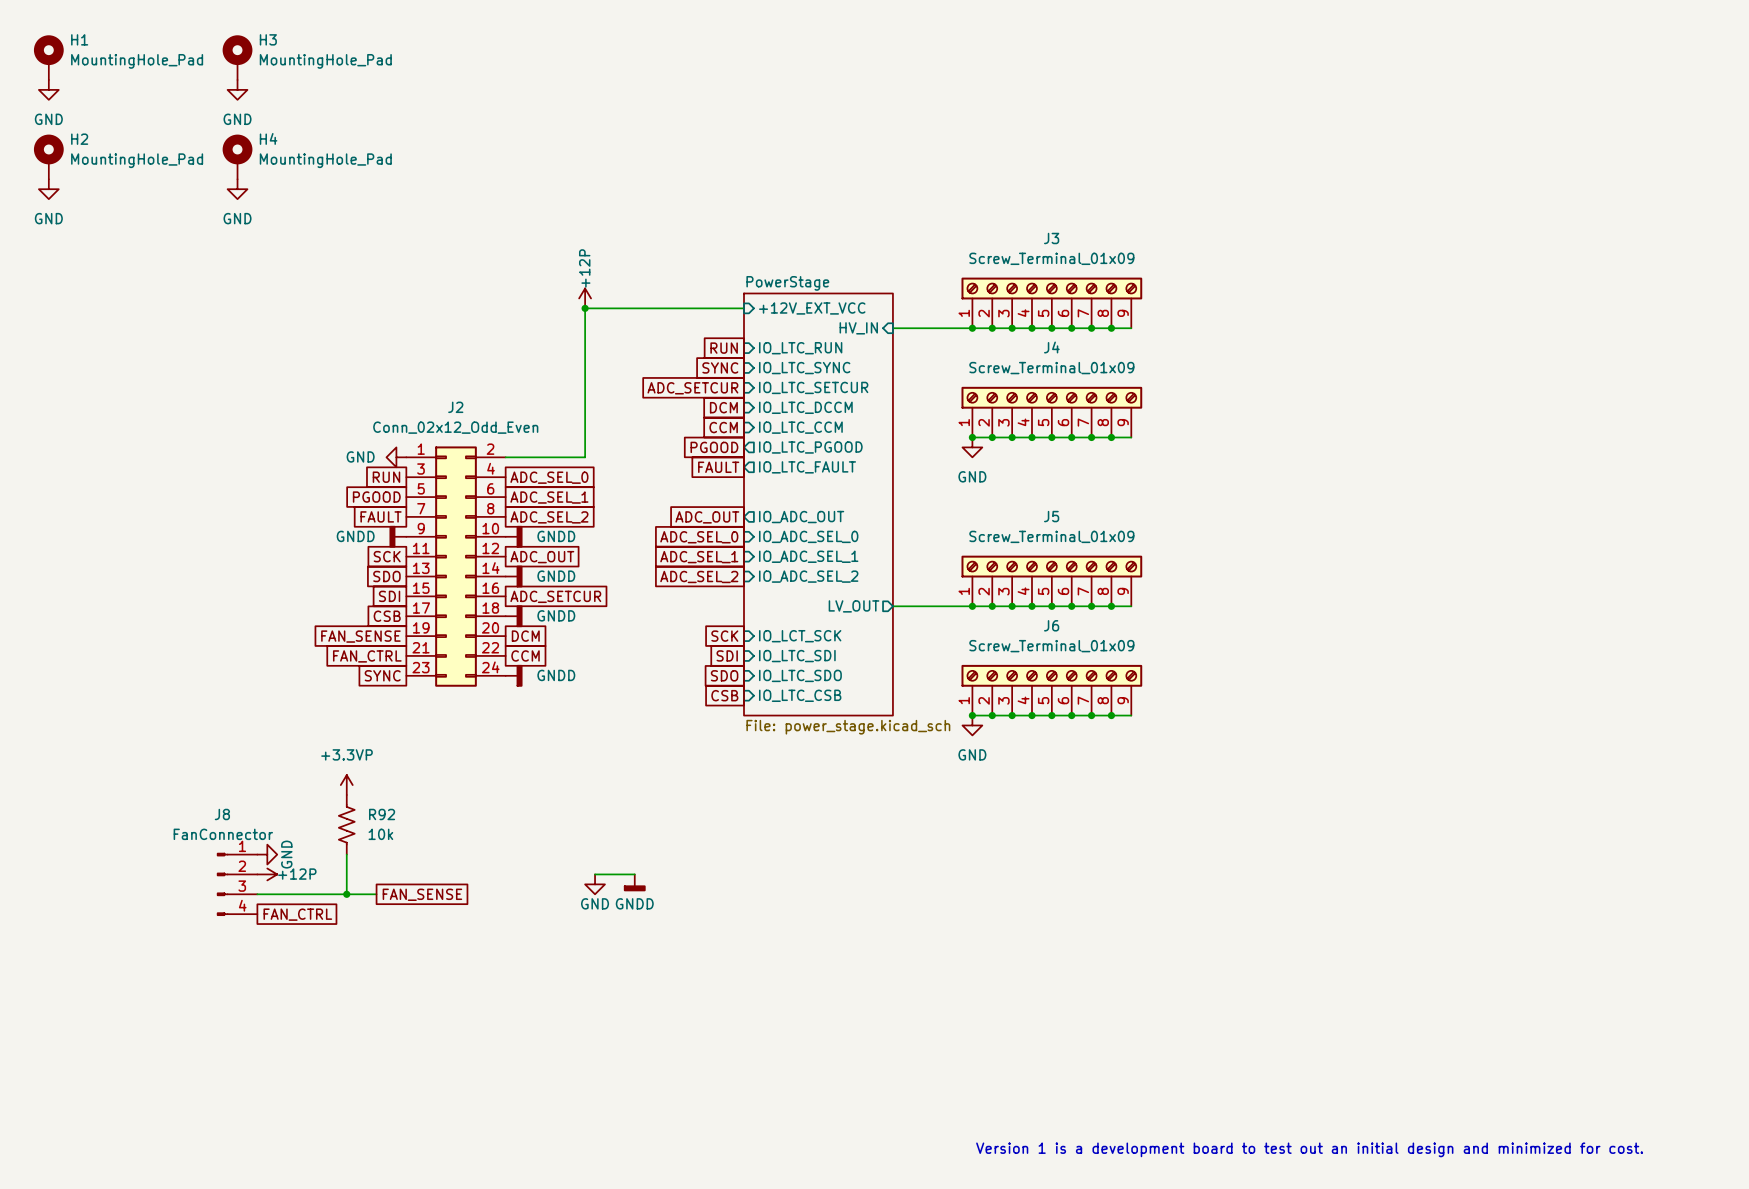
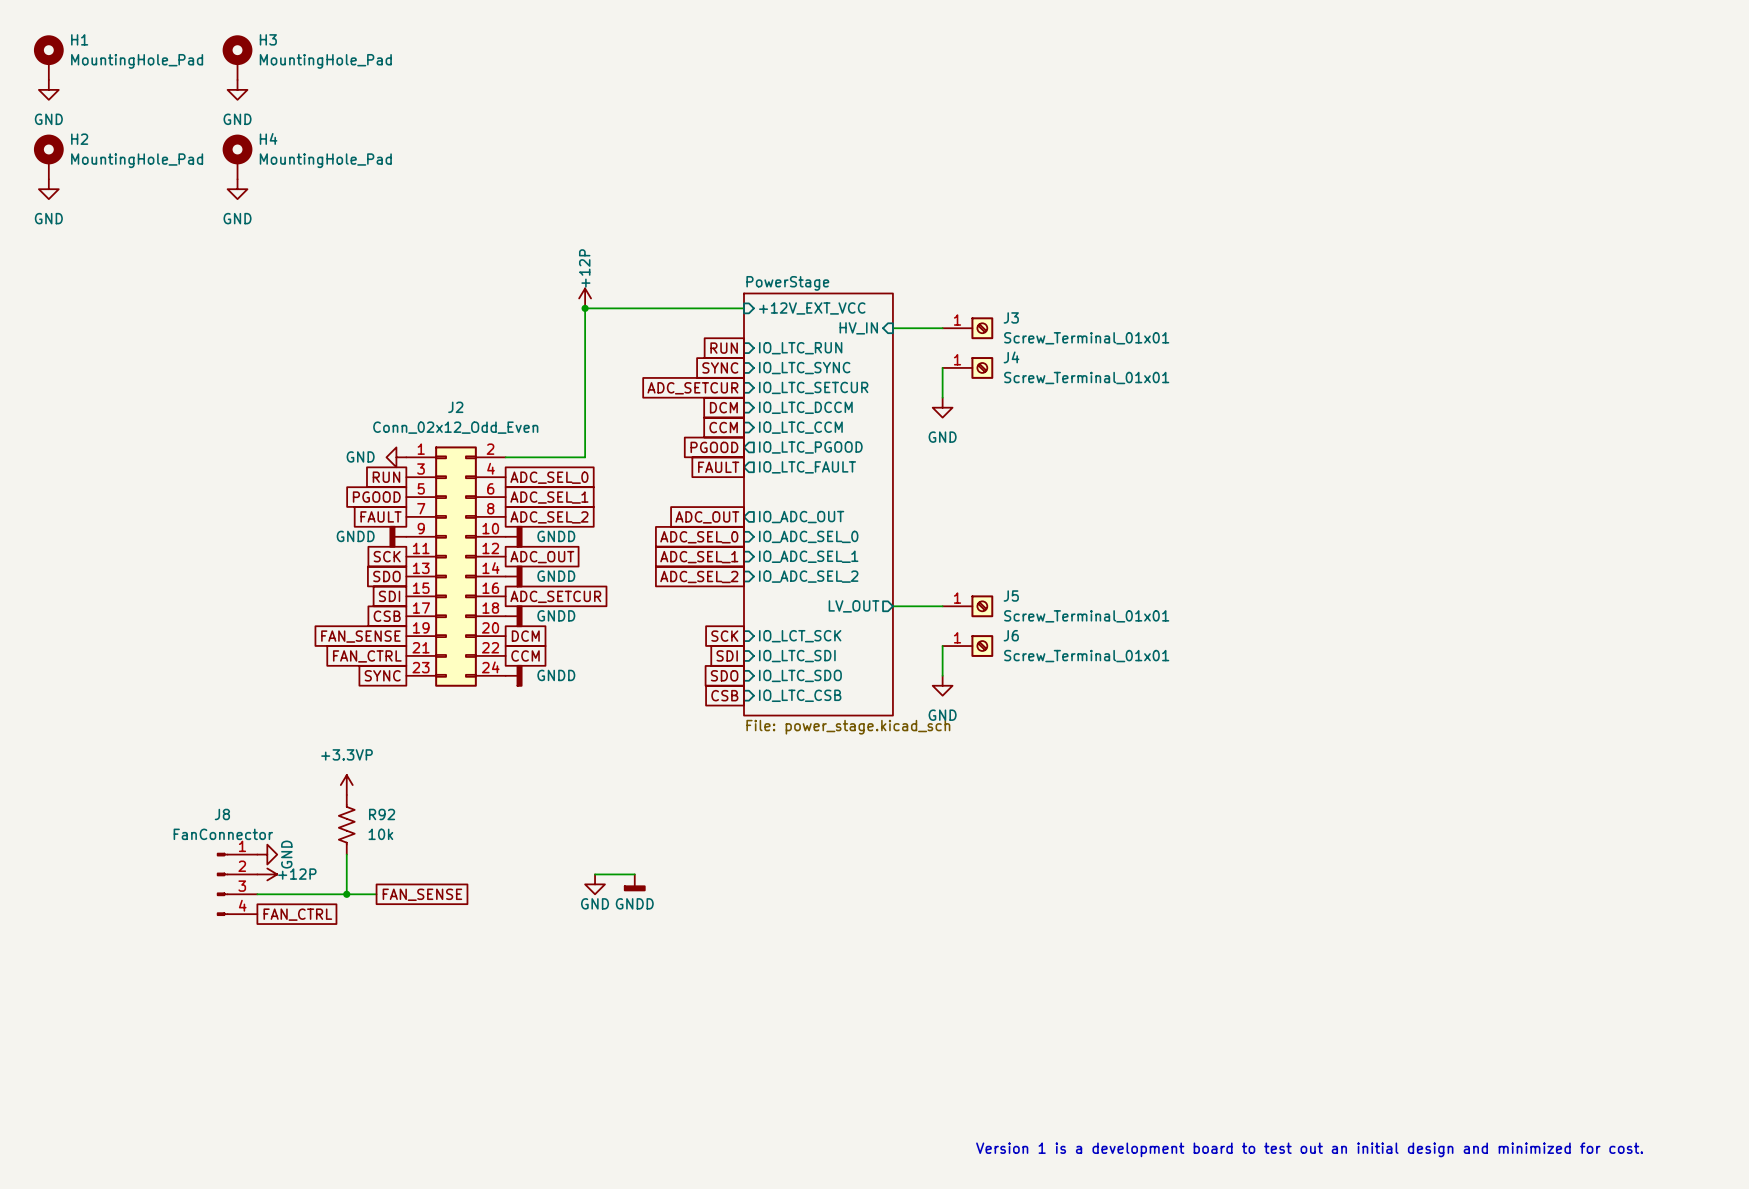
J3 name position: J3 (1051, 238) -> J3 (1011, 317)
J3 value: Screw_Terminal_01x09 (1051, 258) -> Screw_Terminal_01x01 (1086, 338)
J3 symbol: [961, 277, 1143, 329] -> [942, 317, 994, 340]
wire: (942, 328) (1131, 328) -> none
junction: (972, 328) -> none
junction: (992, 328) -> none
junction: (1012, 328) -> none
junction: (1031, 328) -> none
junction: (1051, 328) -> none
junction: (1071, 328) -> none
junction: (1091, 328) -> none
junction: (1111, 328) -> none
J4 name position: J4 (1051, 347) -> J4 (1011, 357)
wire: none -> (942, 367) (942, 397)
J4 value: Screw_Terminal_01x09 (1051, 368) -> Screw_Terminal_01x01 (1086, 377)
J4 symbol: [961, 386, 1143, 438] -> [942, 357, 994, 379]
wire: (972, 437) (1131, 437) -> none
junction: (972, 437) -> none
junction: (992, 437) -> none
junction: (1012, 437) -> none
junction: (1031, 437) -> none
junction: (1051, 437) -> none
junction: (1071, 437) -> none
junction: (1091, 437) -> none
junction: (1111, 437) -> none
power symbol position: GND (972, 447) -> GND (942, 407)
J5 name position: J5 (1051, 516) -> J5 (1011, 596)
J5 value: Screw_Terminal_01x09 (1051, 536) -> Screw_Terminal_01x01 (1086, 616)
J5 symbol: [961, 555, 1143, 607] -> [942, 595, 994, 618]
wire: (942, 606) (1131, 606) -> none
junction: (972, 606) -> none
junction: (992, 606) -> none
junction: (1012, 606) -> none
junction: (1031, 606) -> none
junction: (1051, 606) -> none
junction: (1071, 606) -> none
junction: (1091, 606) -> none
junction: (1111, 606) -> none
J6 name position: J6 (1051, 625) -> J6 (1011, 635)
wire: none -> (942, 646) (942, 675)
J6 value: Screw_Terminal_01x09 (1051, 646) -> Screw_Terminal_01x01 (1086, 656)
J6 symbol: [961, 664, 1143, 716] -> [942, 635, 994, 657]
wire: (972, 715) (1131, 715) -> none
junction: (972, 715) -> none
junction: (992, 715) -> none
junction: (1012, 715) -> none
junction: (1031, 715) -> none
junction: (1051, 715) -> none
junction: (1071, 715) -> none
junction: (1091, 715) -> none
junction: (1111, 715) -> none
power symbol position: GND (972, 725) -> GND (942, 685)

